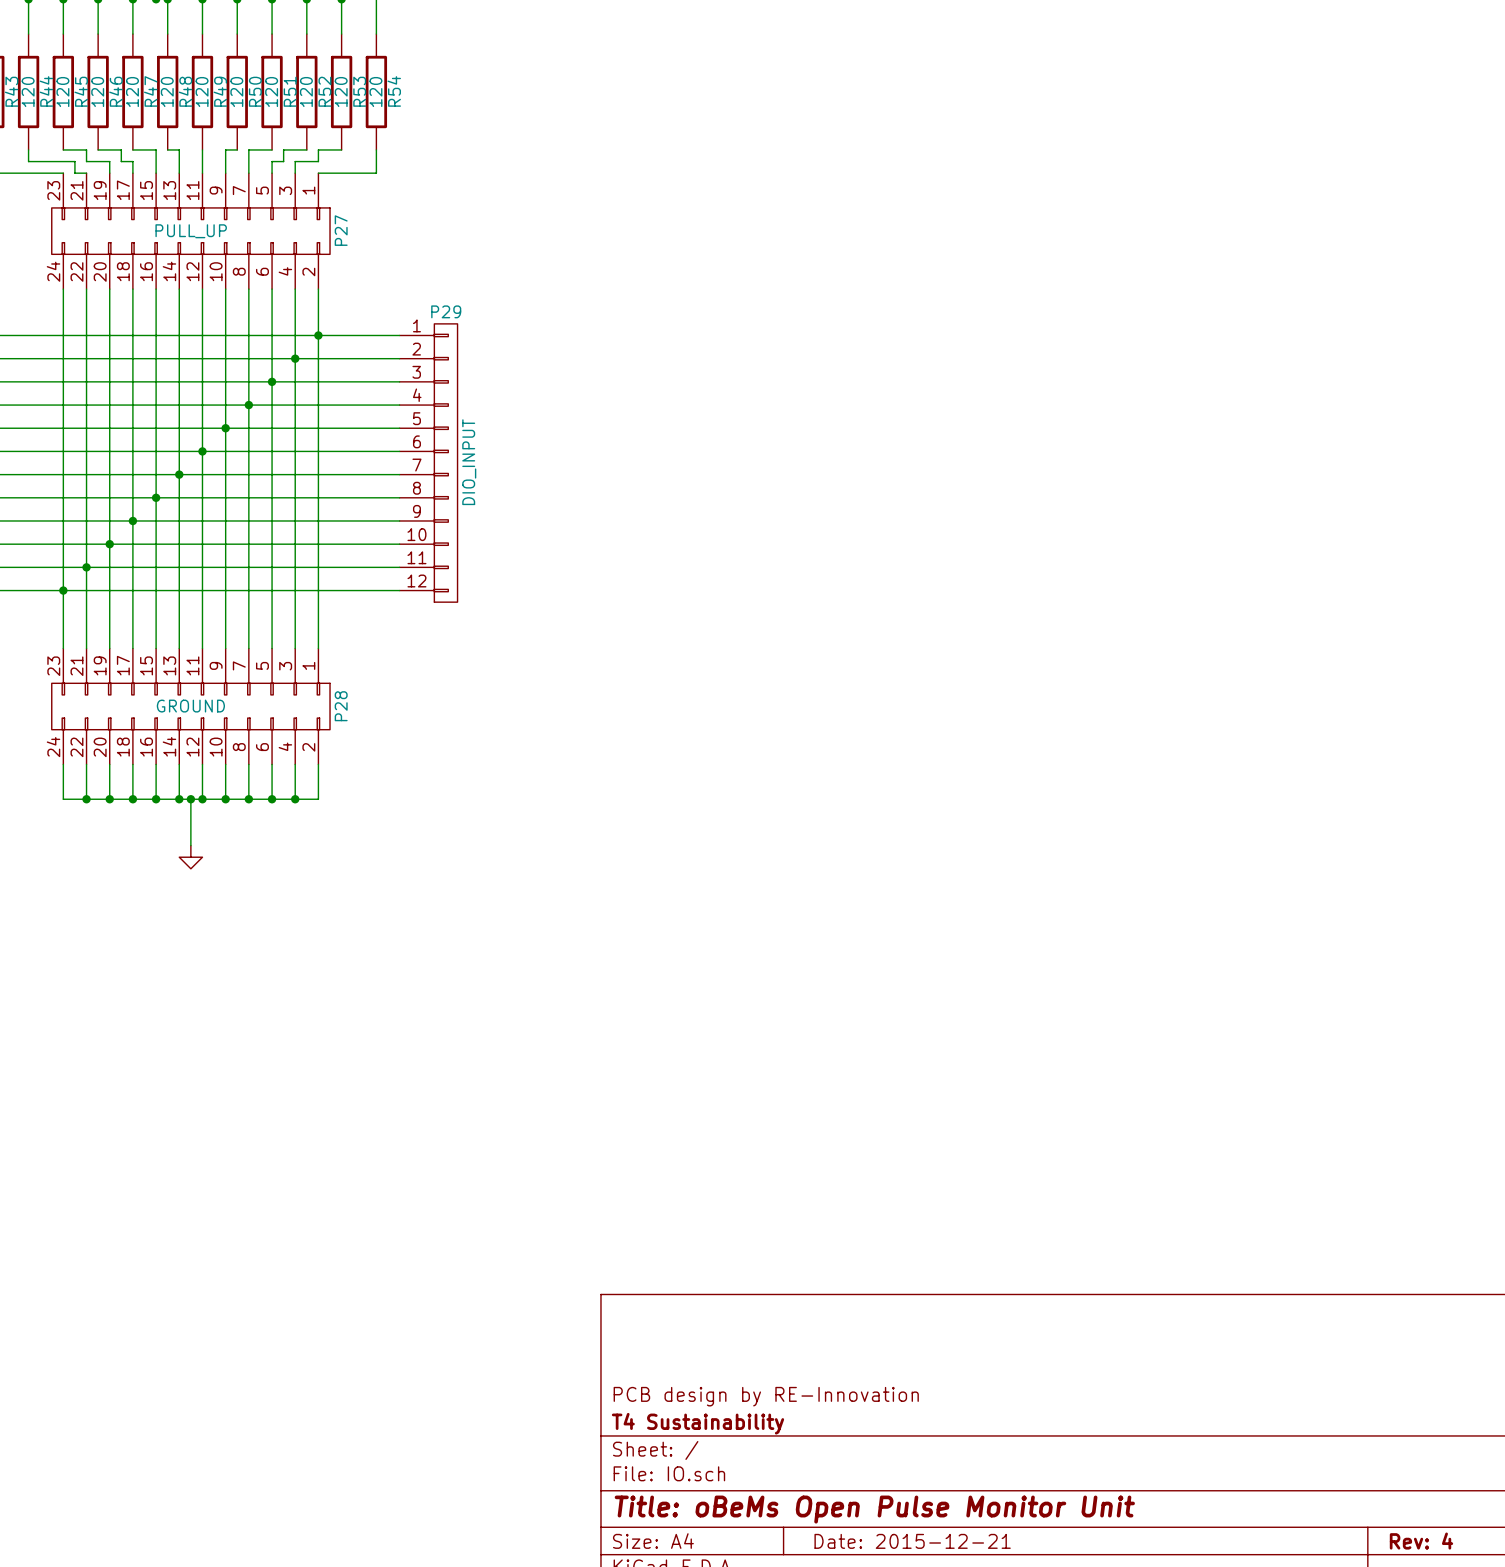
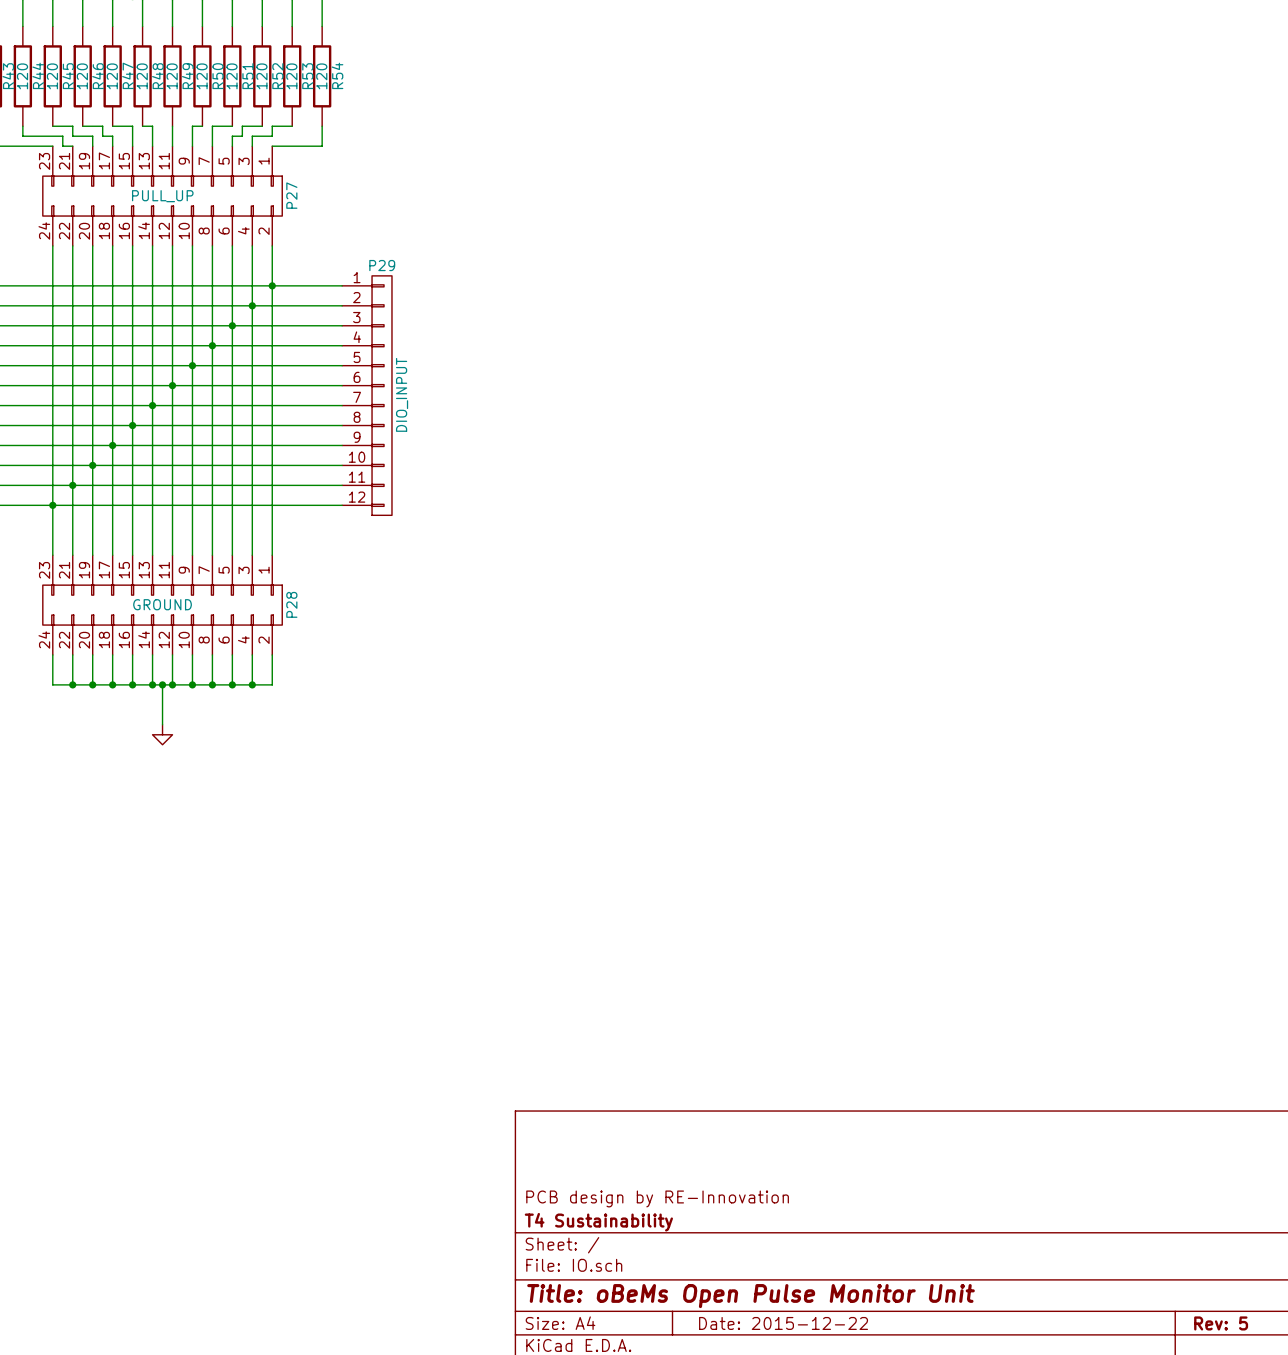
title block: Date: 2015-12-21 (912, 1541) -> Date: 2015-12-22 (783, 1323)
title block: Rev: 4 (1421, 1541) -> Rev: 5 (1221, 1323)

